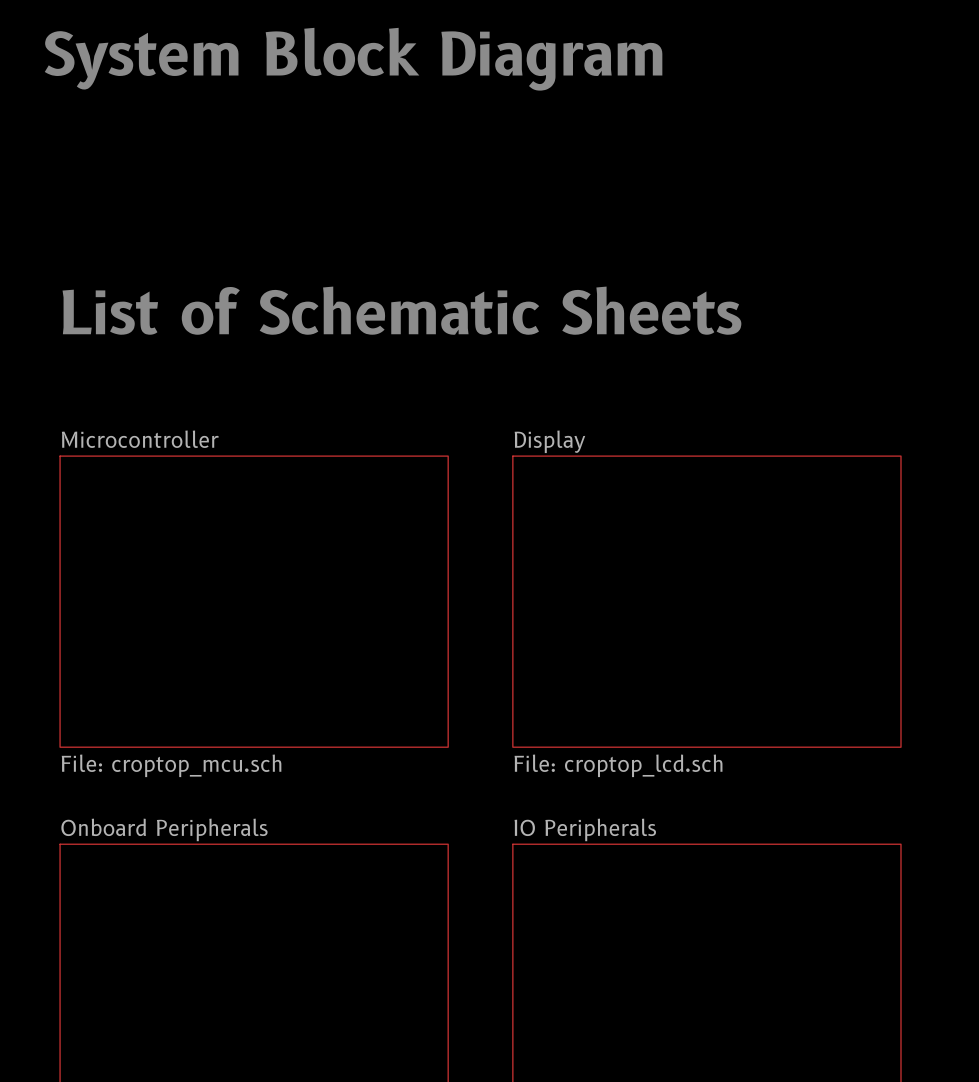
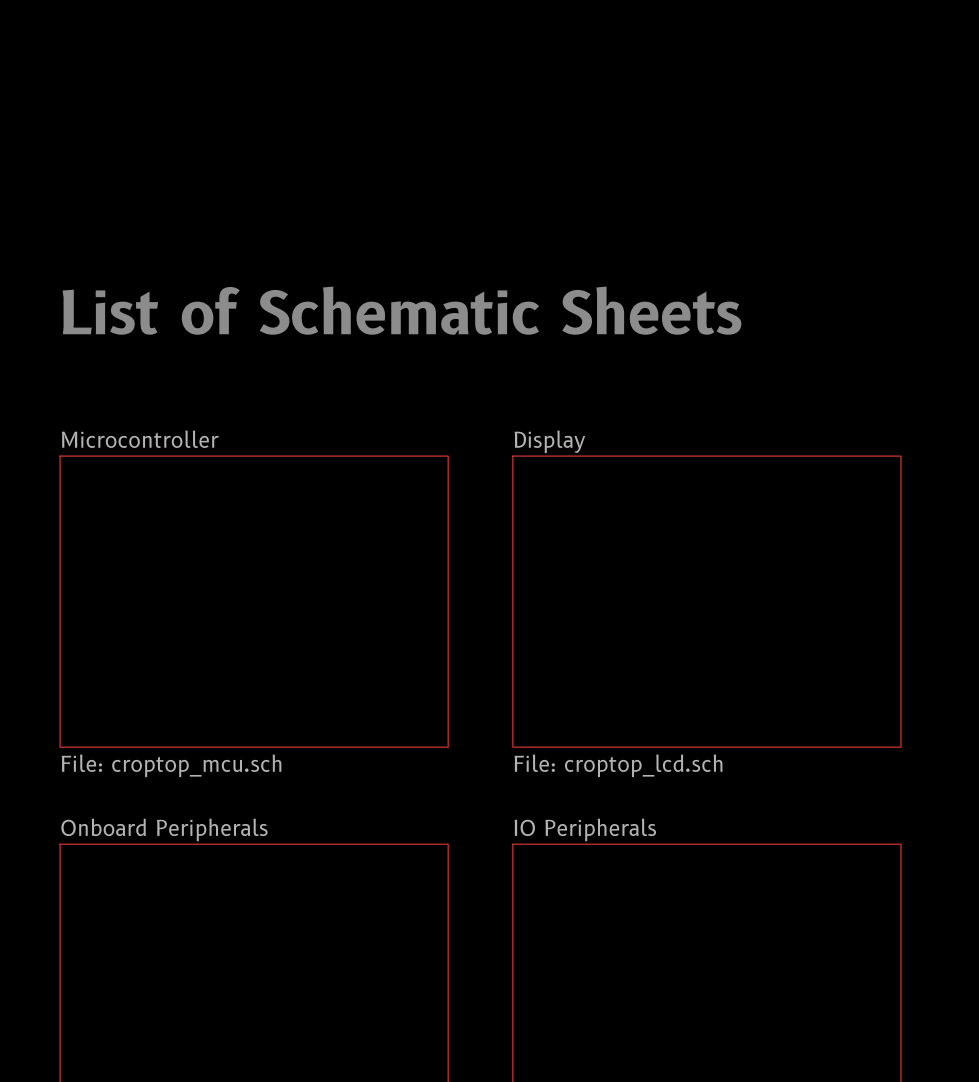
text: System Block Diagram (353, 59) -> none

